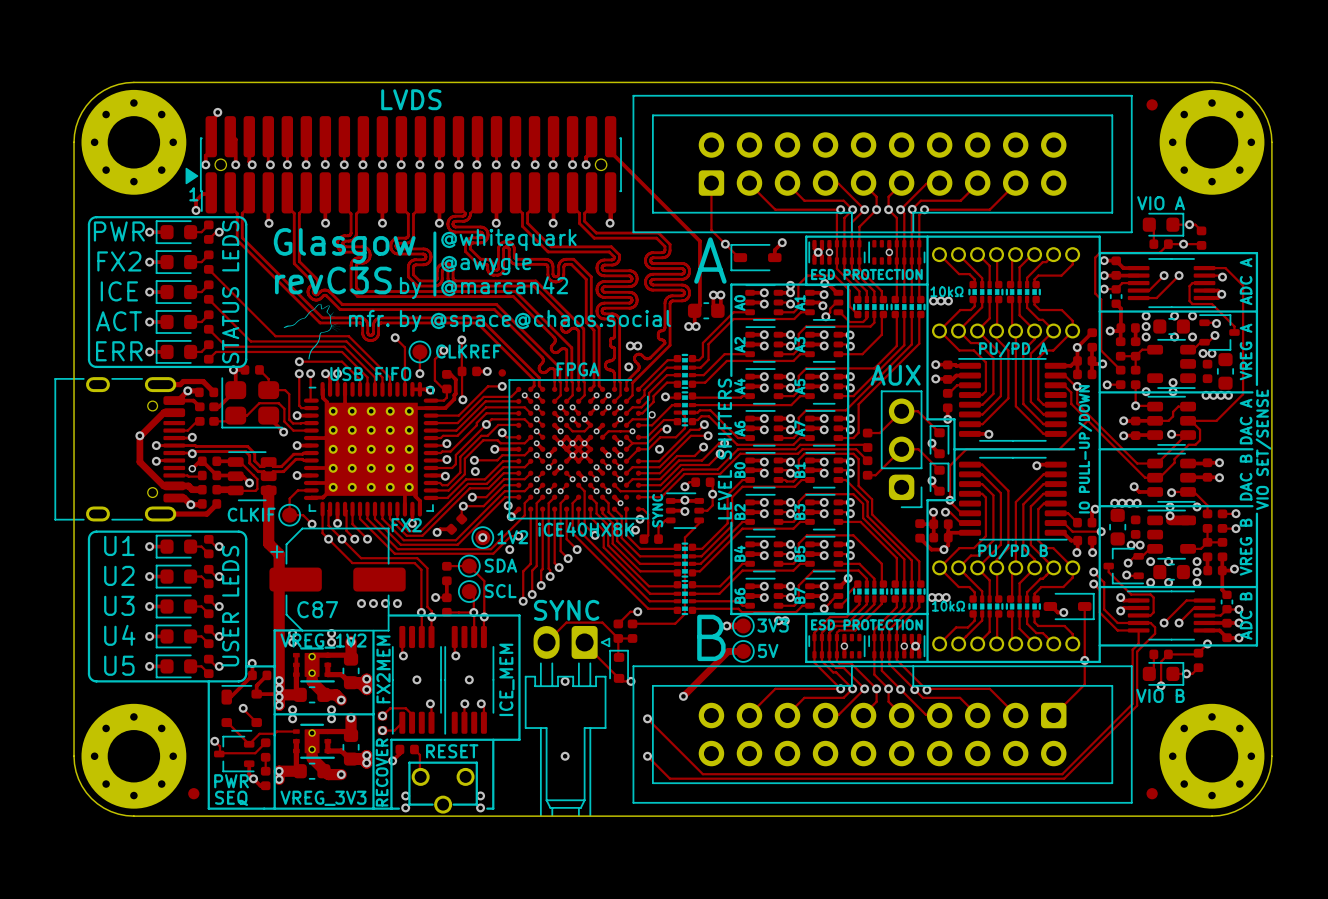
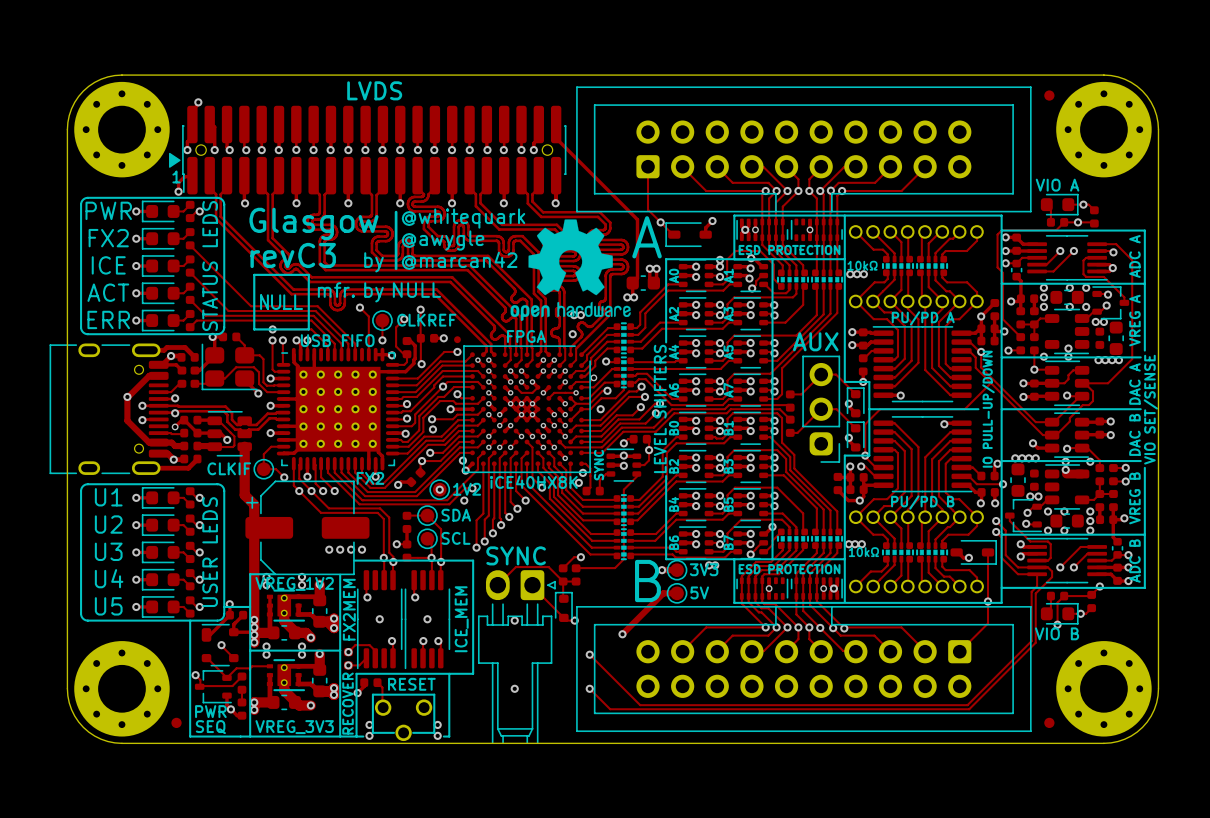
drawing: none -> [510, 219, 631, 322]
text: revC3S (333, 280) -> revC3 (293, 255)
drawing shape: [283, 303, 341, 360] -> [253, 273, 310, 331]
text: @space@chaos.social (550, 320) -> NULL (416, 290)
C87 name: C87 (317, 609) -> none

